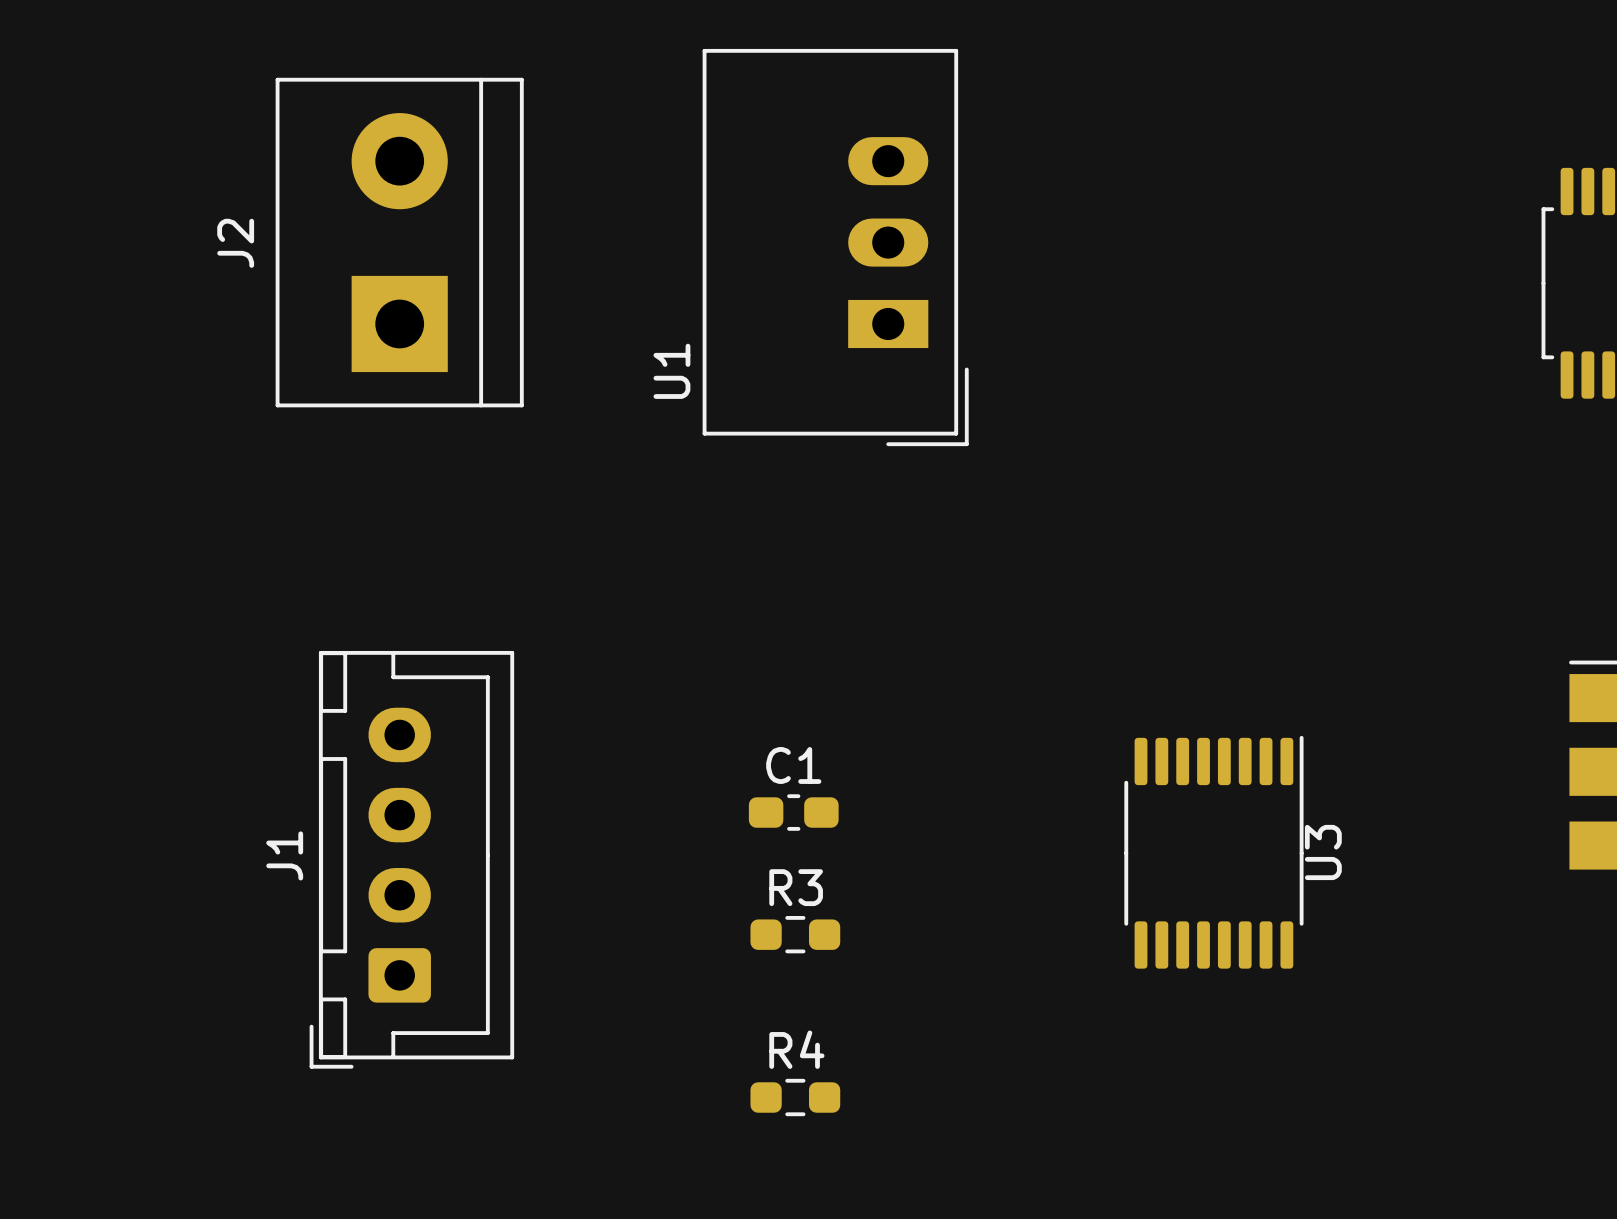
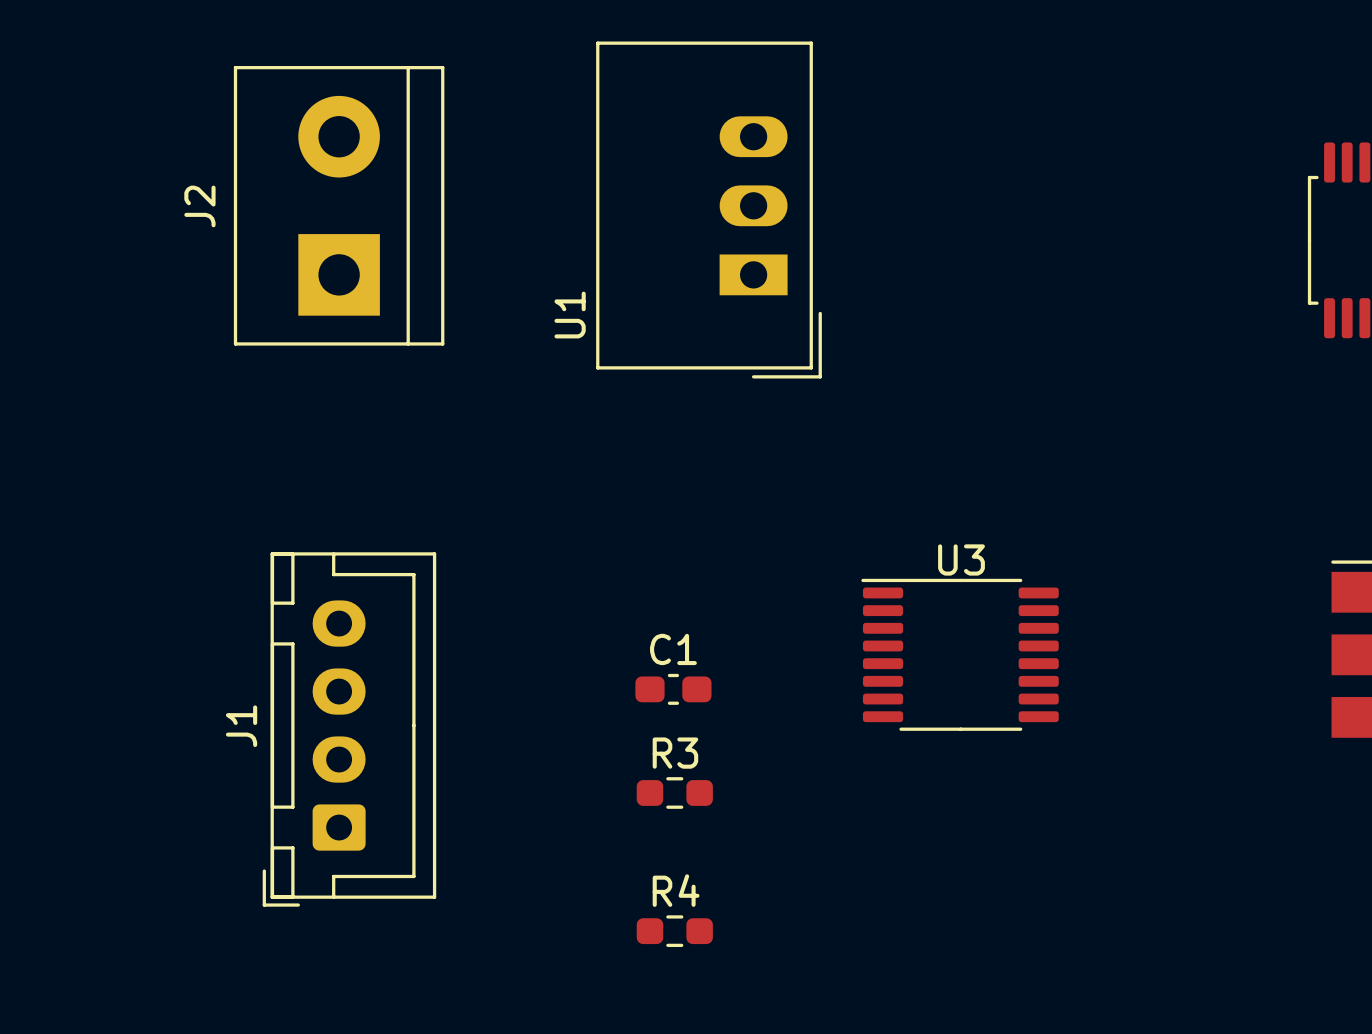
U3 rotation: 0° (1213, 852) -> 90° counterclockwise (960, 654)

